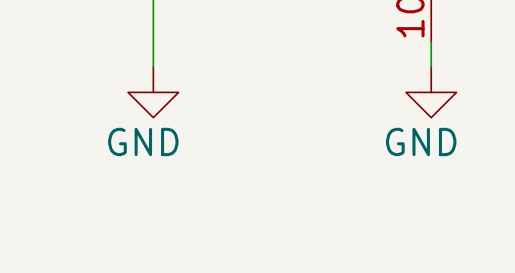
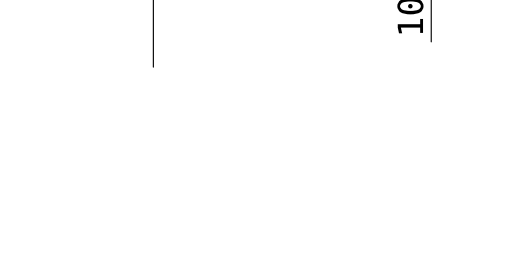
wire: (431, 41) (431, 67) -> none
power symbol: GND (153, 92) -> none
power symbol: GND (431, 92) -> none

